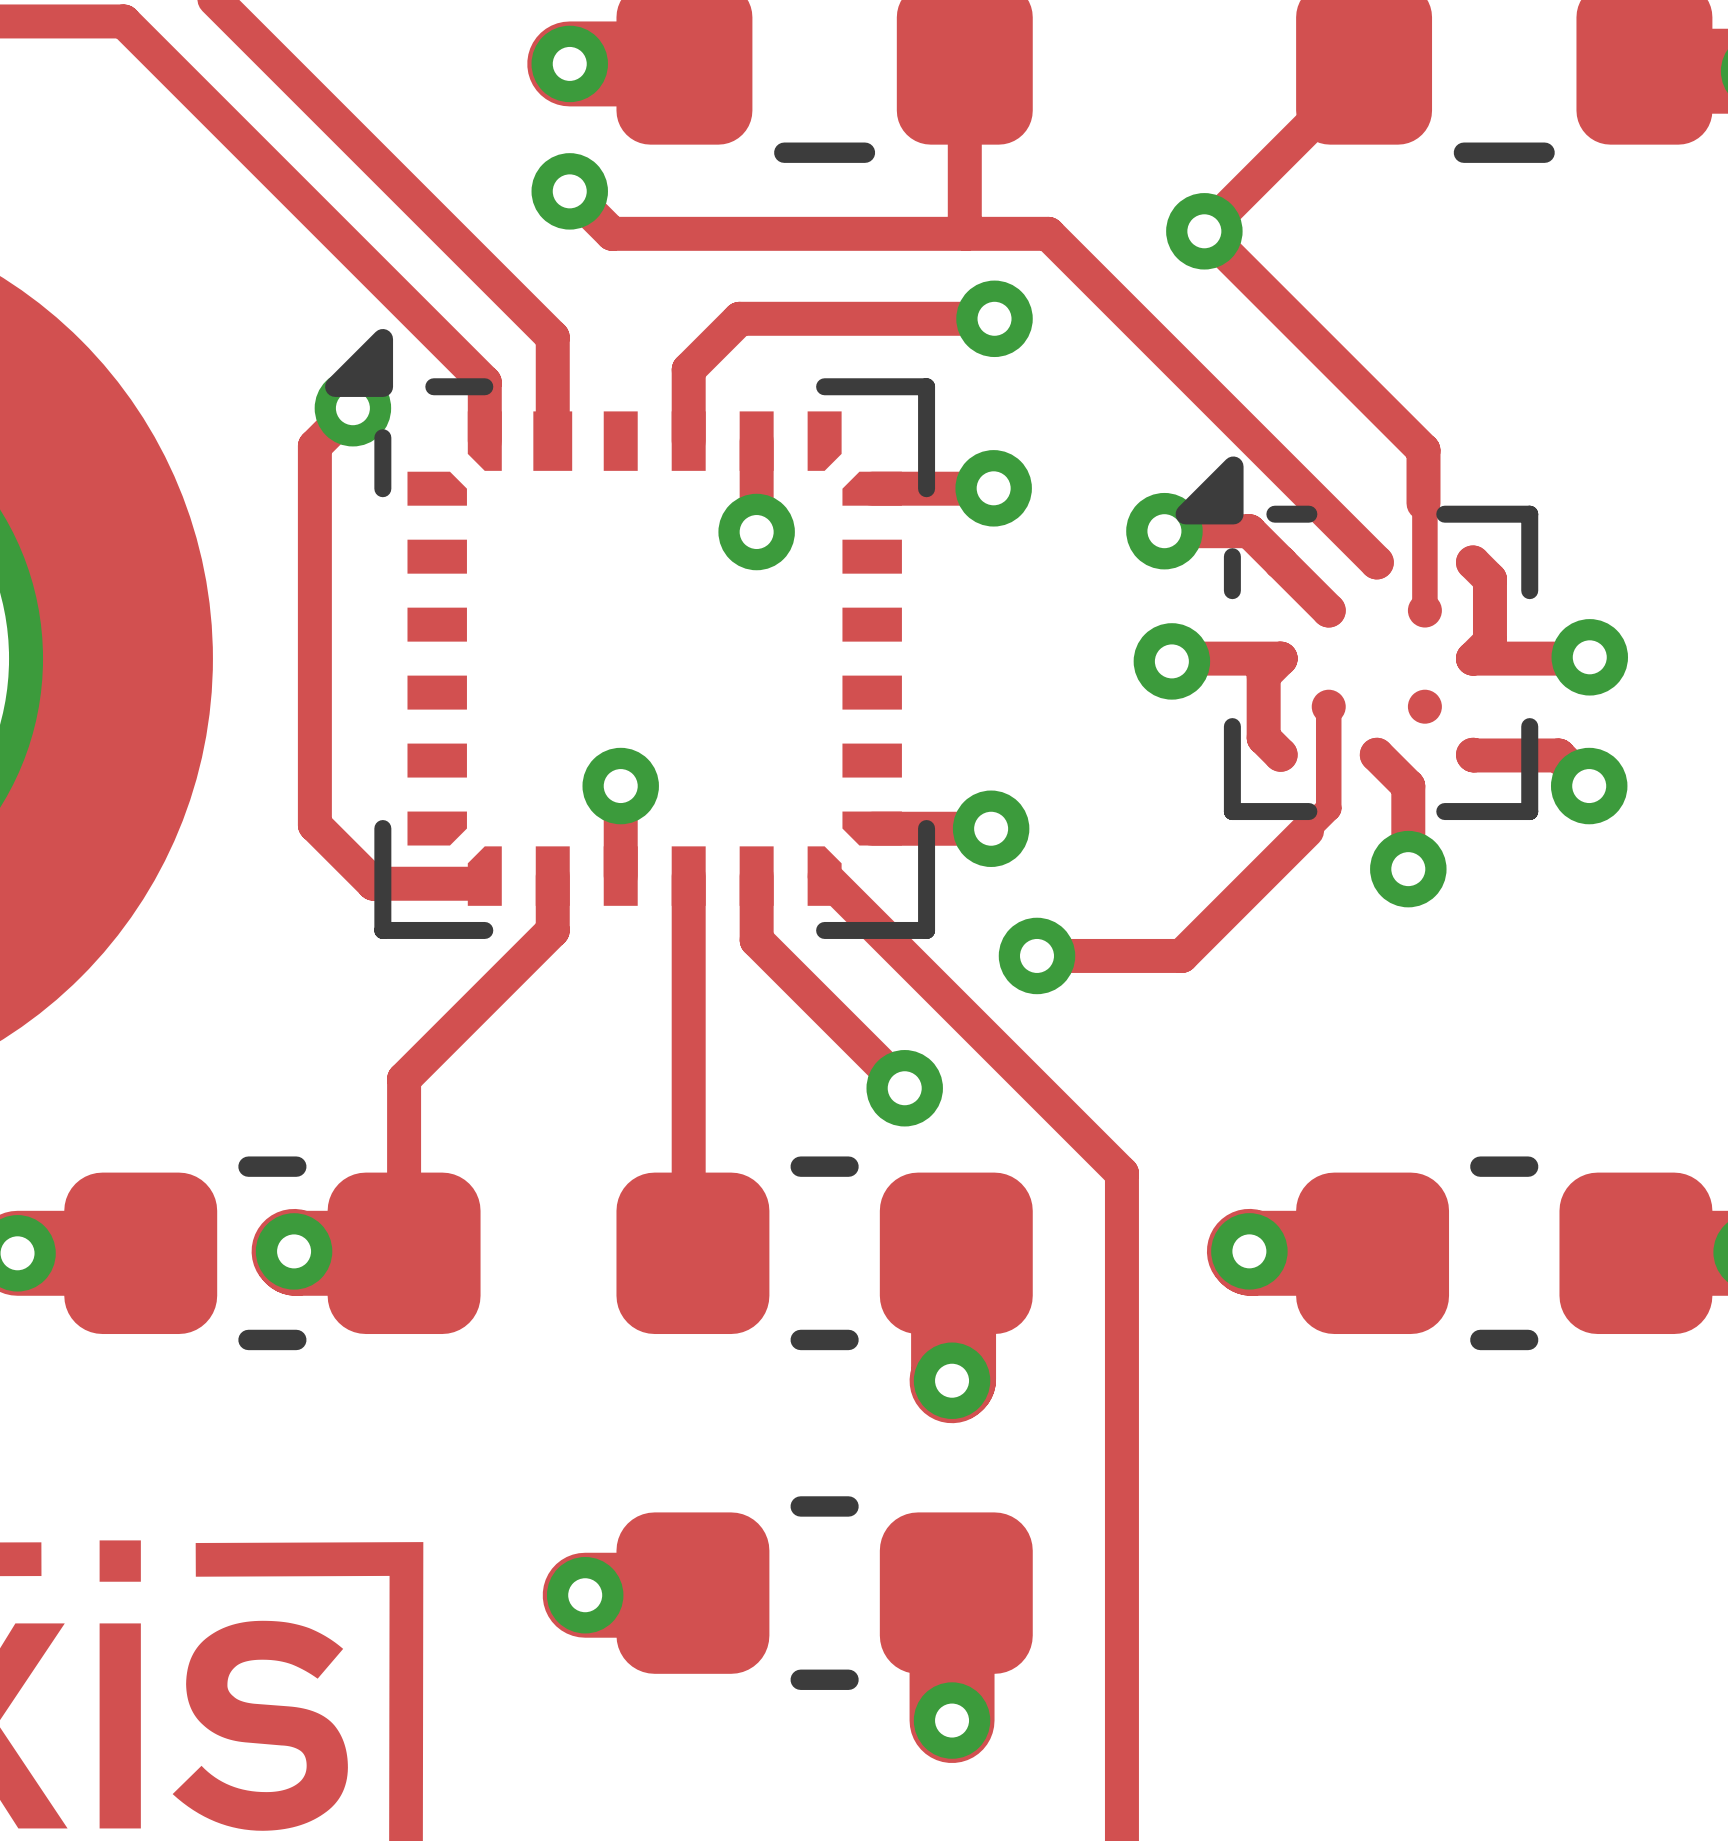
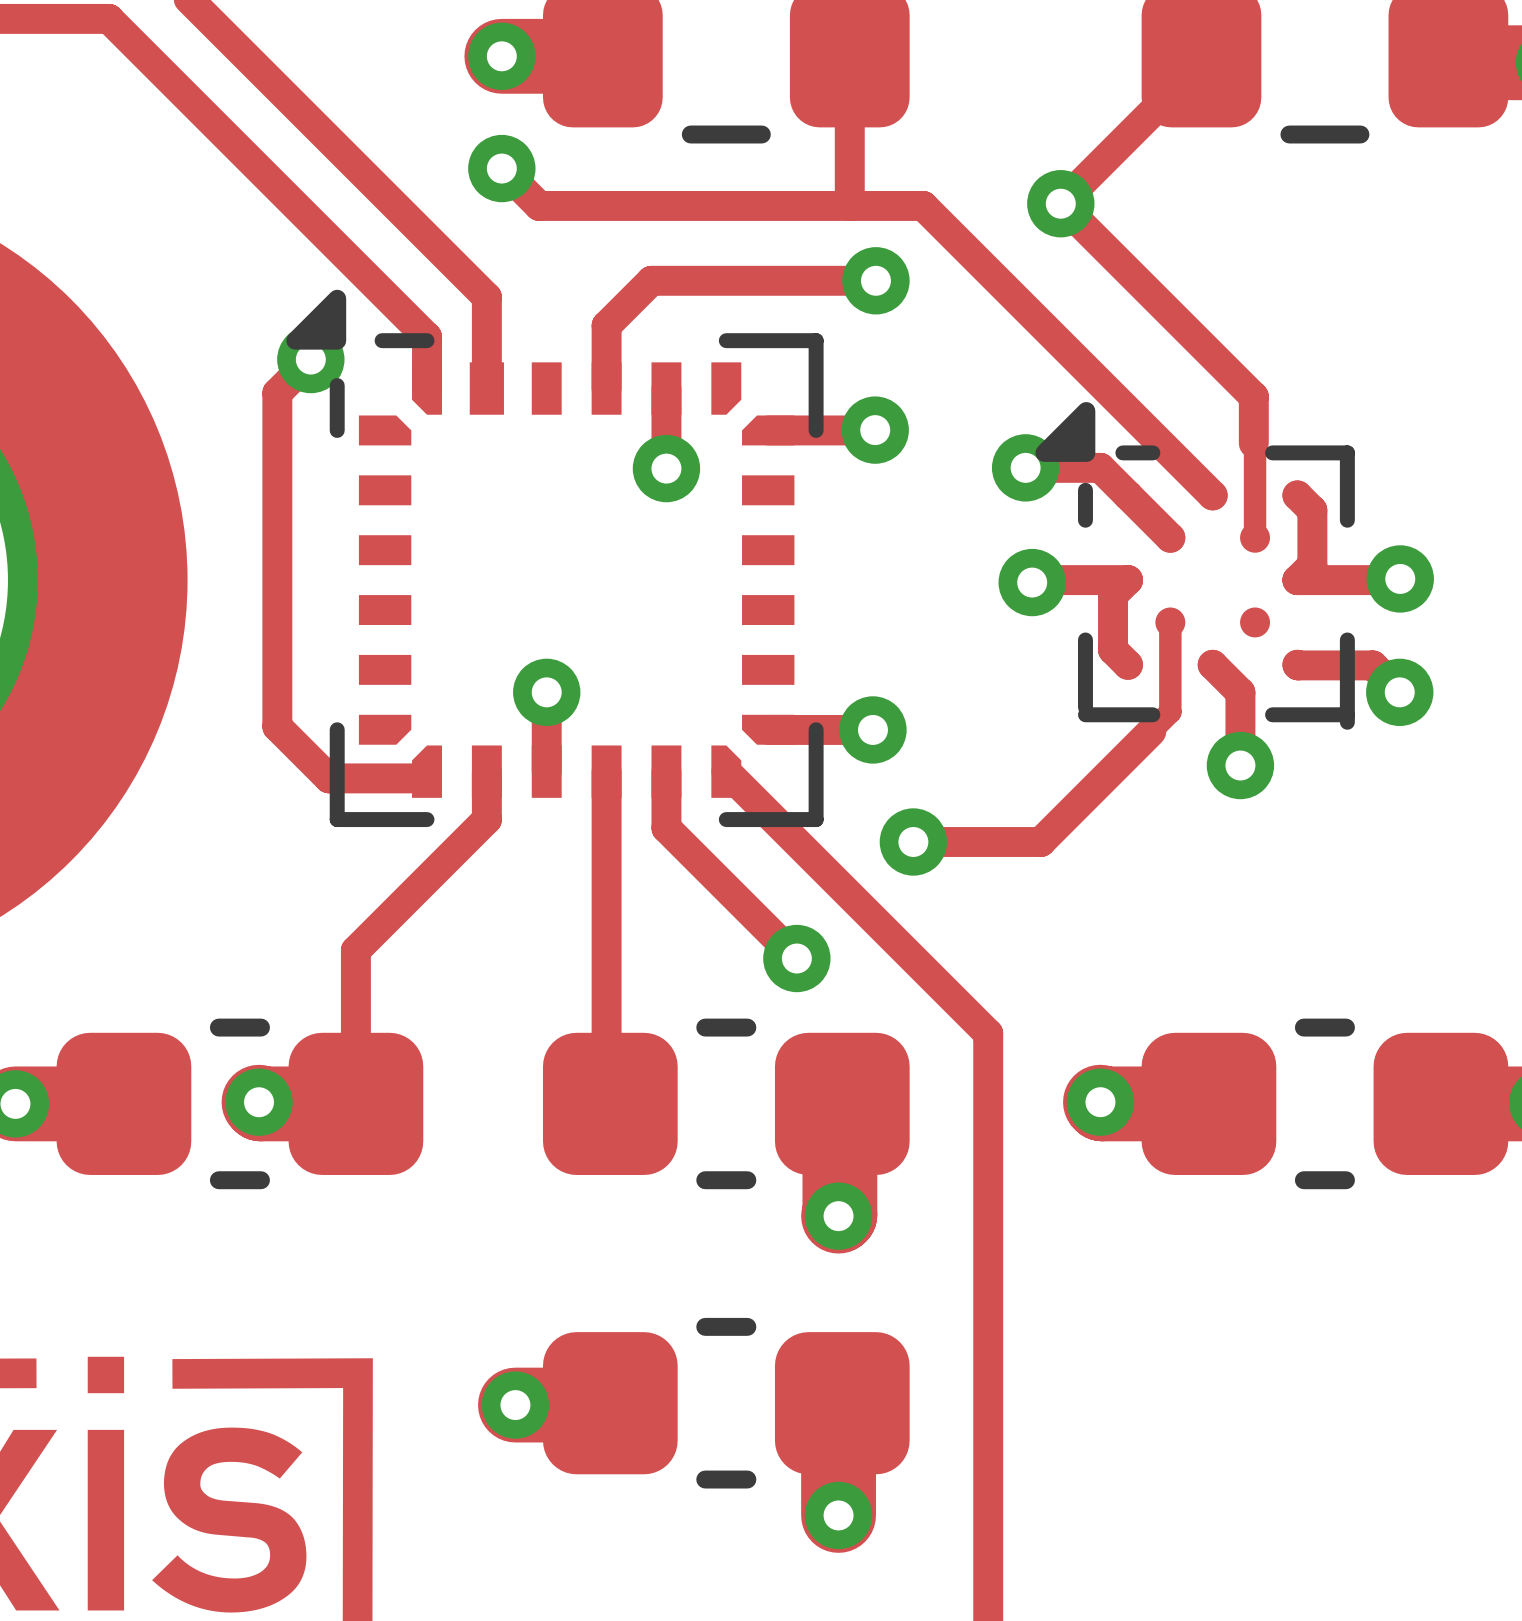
part footprint: [1175, 456, 1539, 821] -> [1035, 402, 1355, 730]

